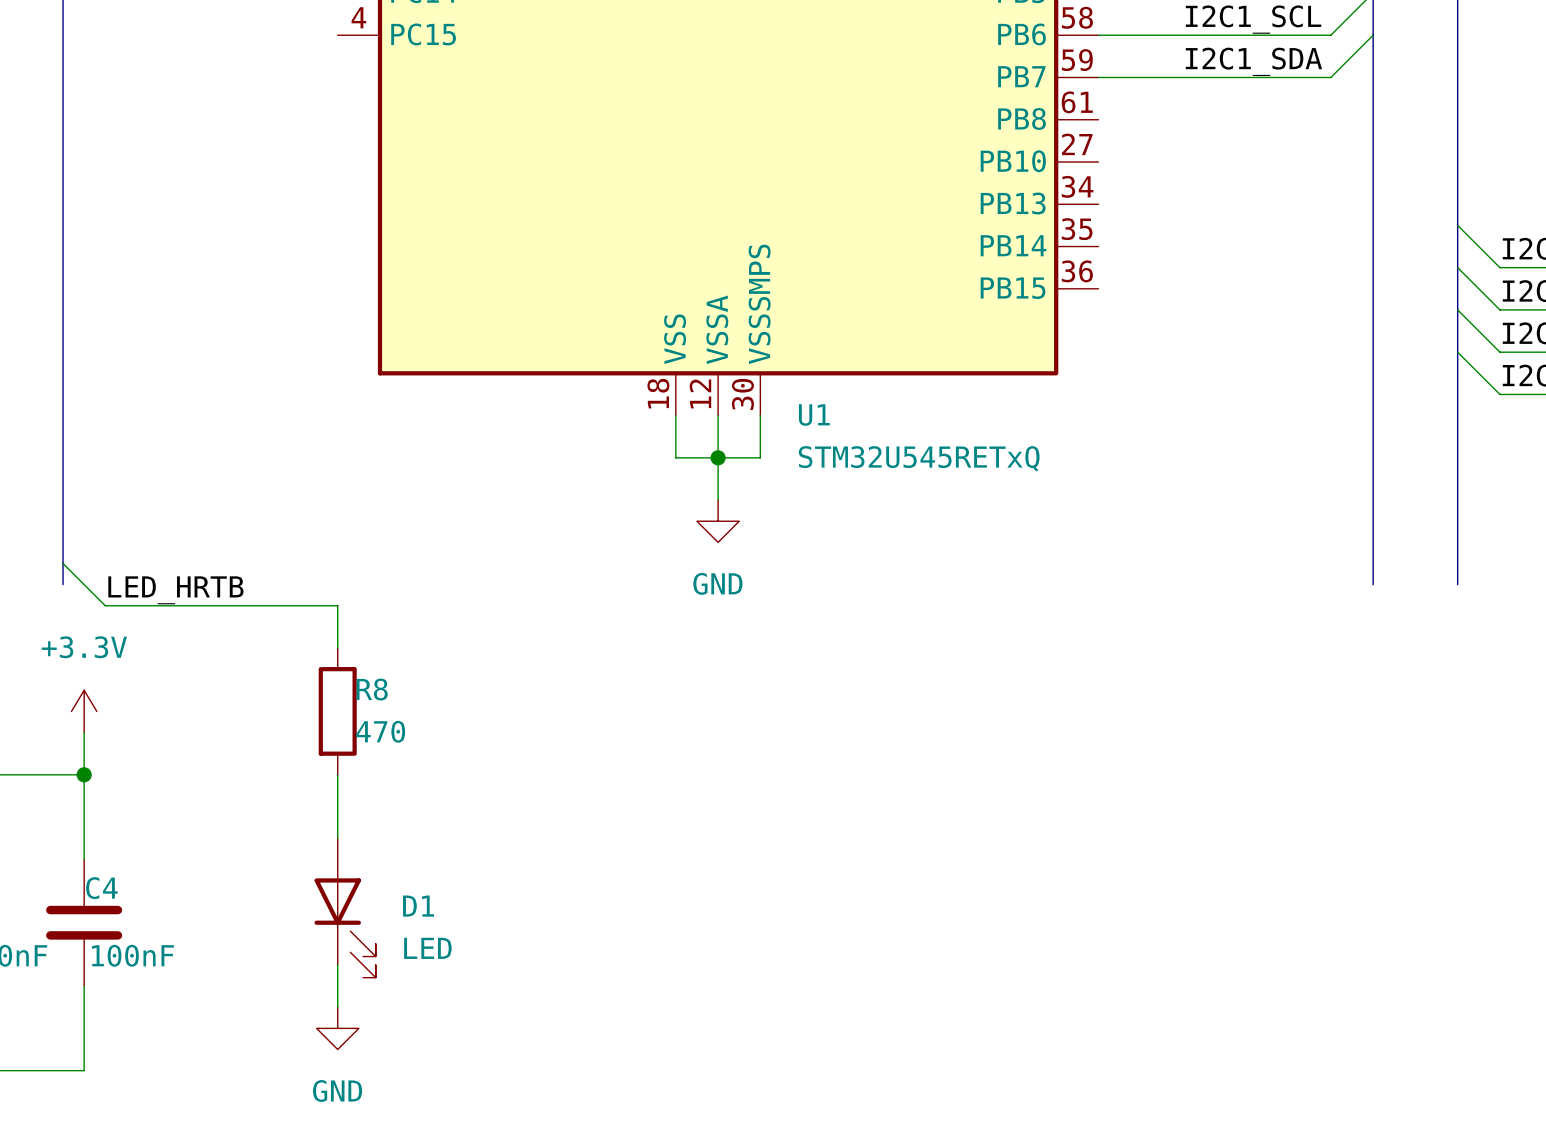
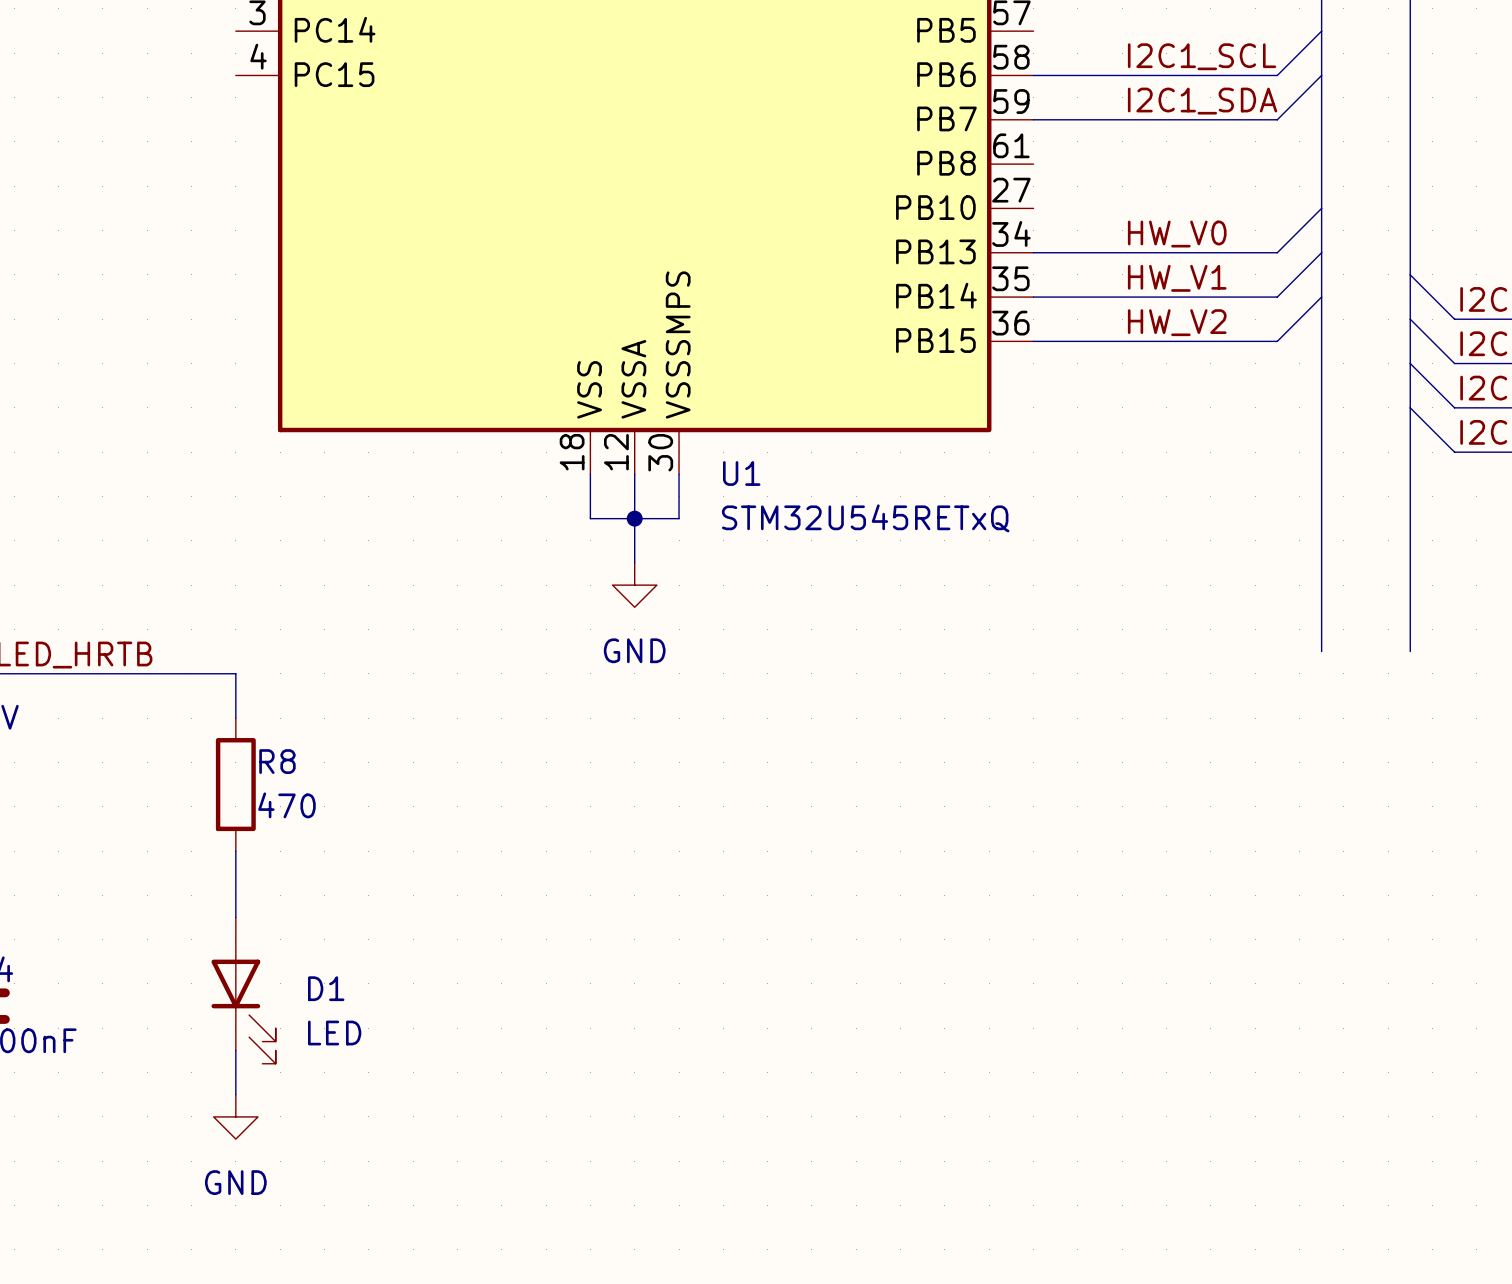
wire: none -> (1321, 208) (1277, 252) (1033, 252)
label: none -> HW_V0 (1177, 234)
wire: none -> (1321, 252) (1277, 297) (1033, 297)
label: none -> HW_V1 (1177, 278)
wire: none -> (1321, 297) (1277, 341) (1033, 341)
label: none -> HW_V2 (1177, 322)

